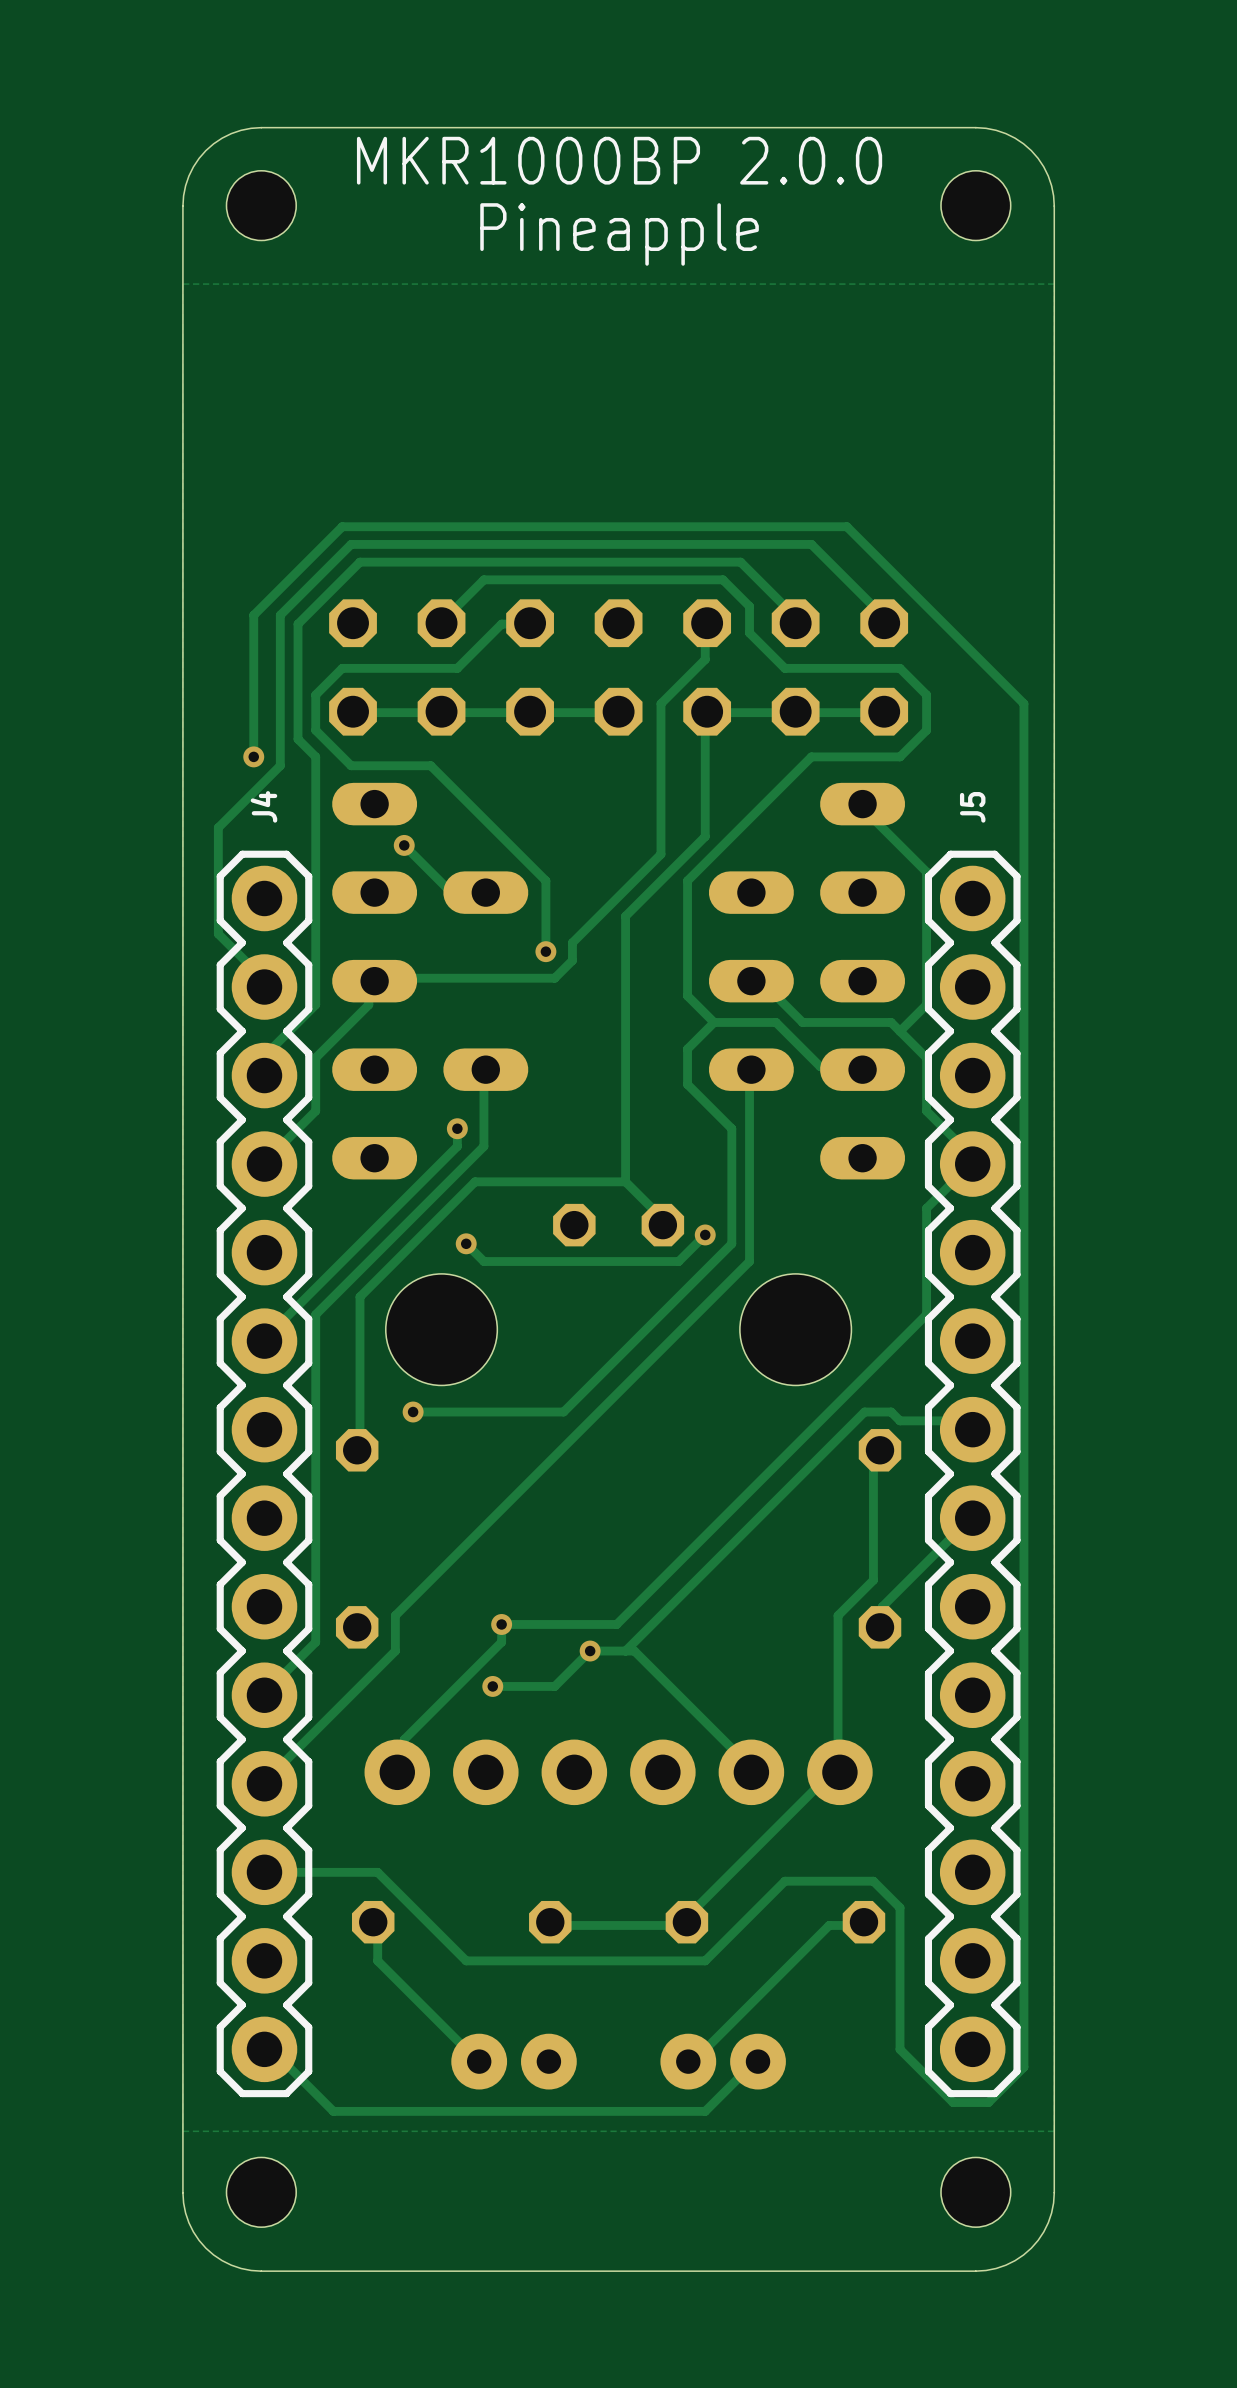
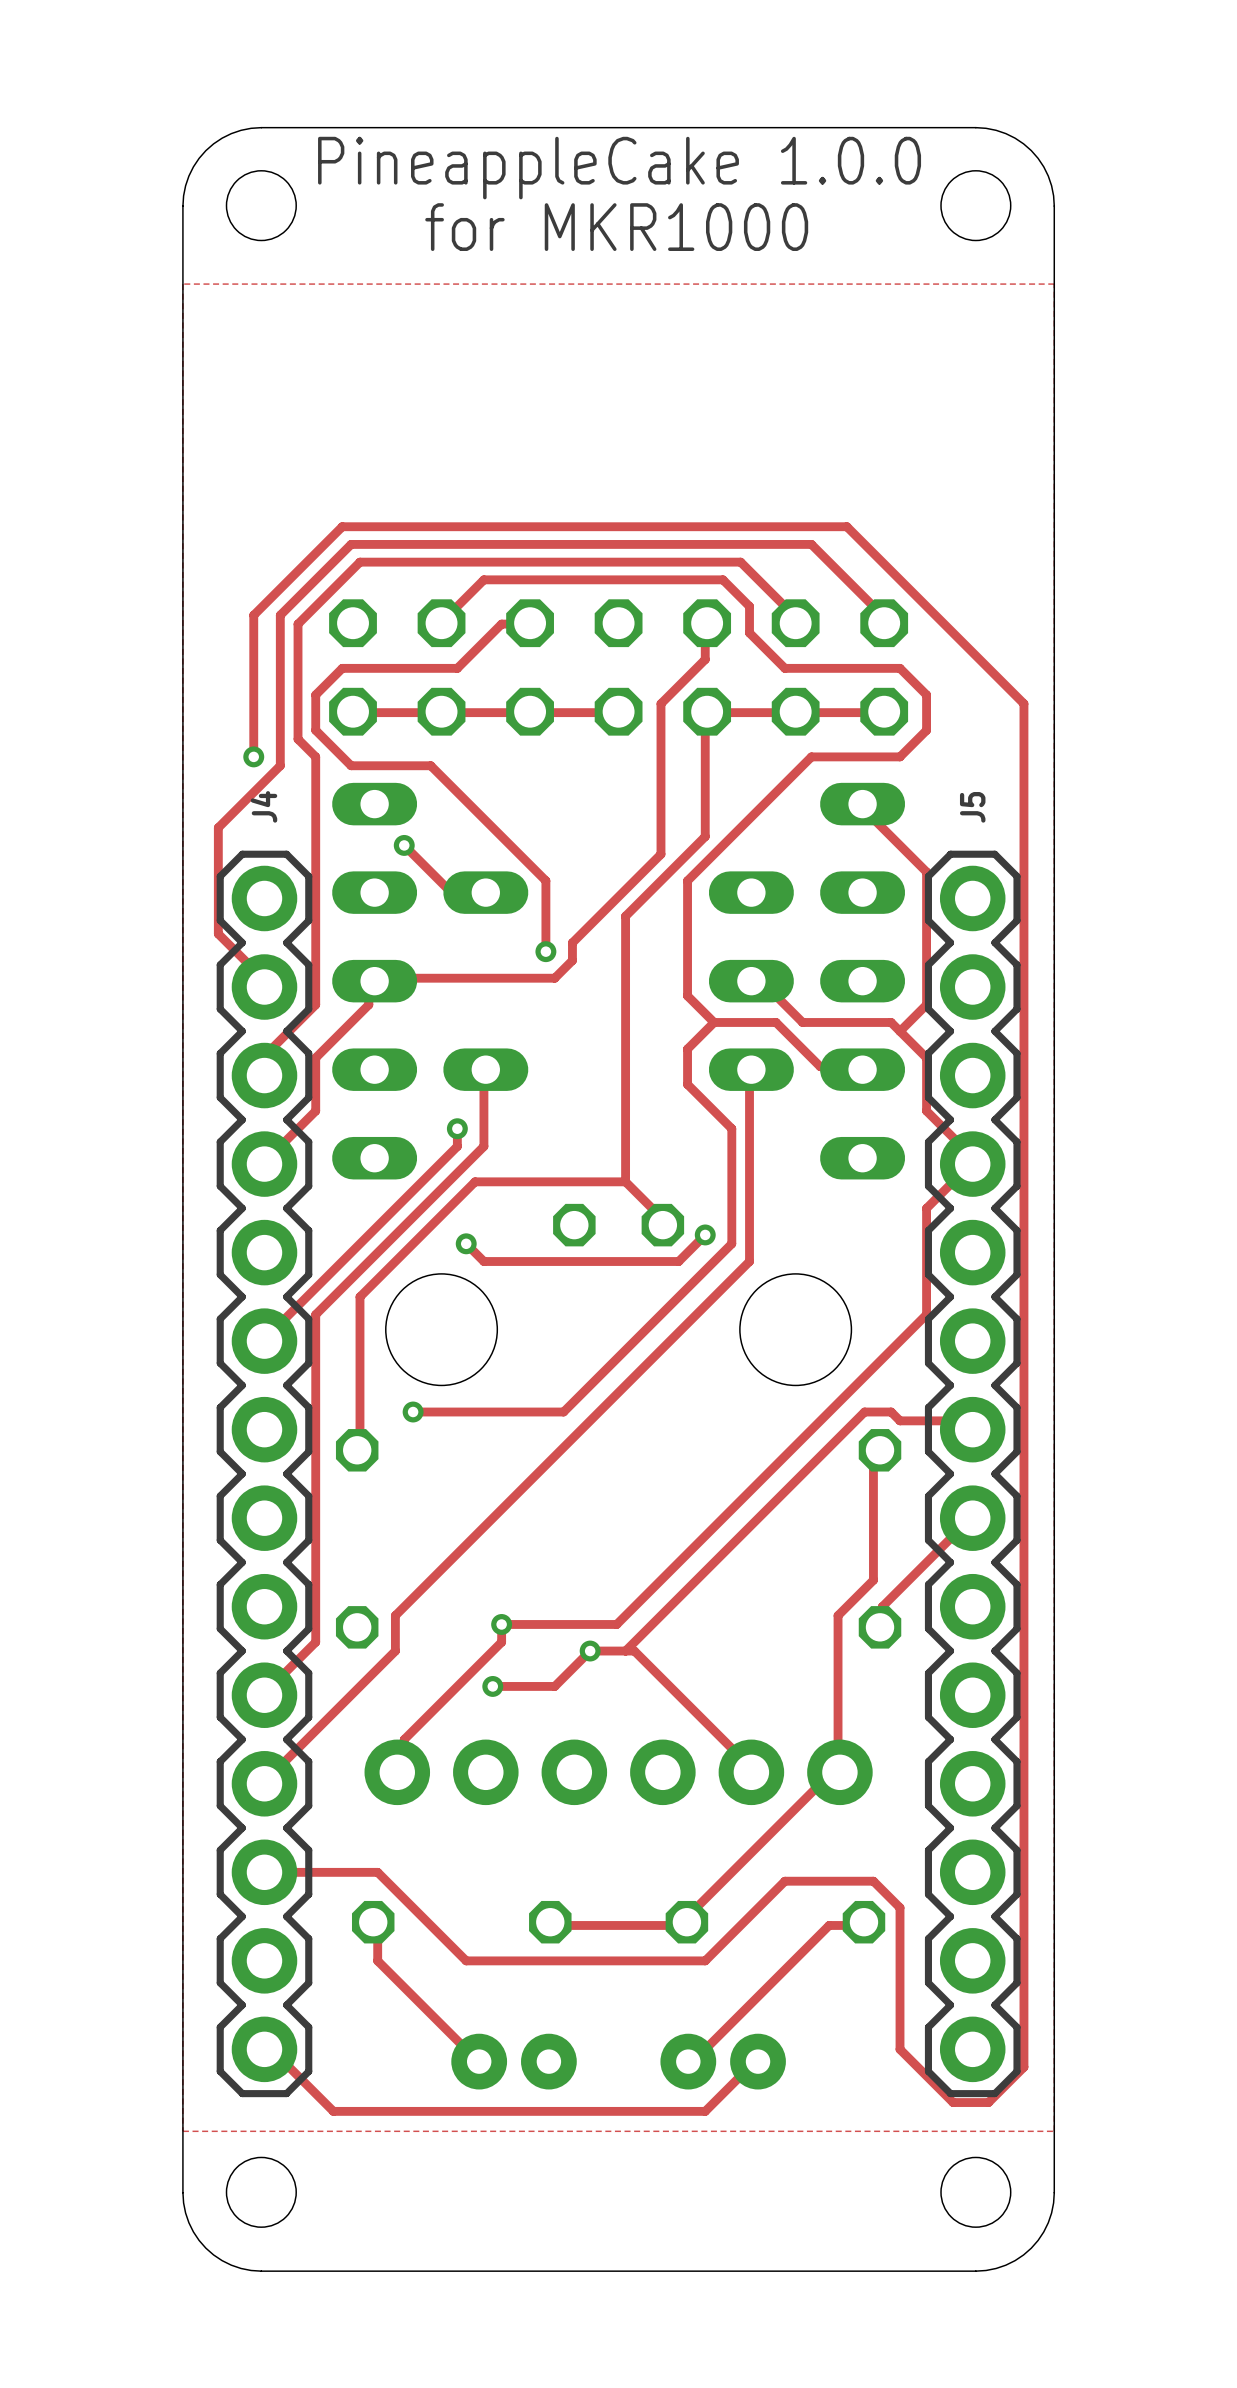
text: MKR1000BP 2.0.0 (619, 160) -> PineappleCake 1.0.0 (619, 168)
text: Pineapple (619, 234) -> for MKR1000 (616, 227)

